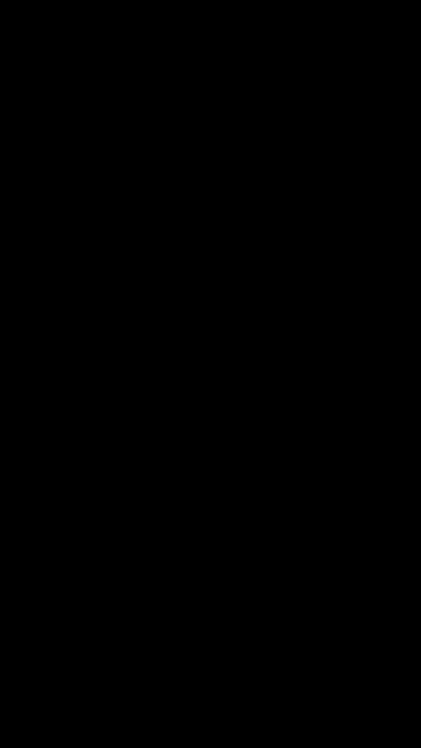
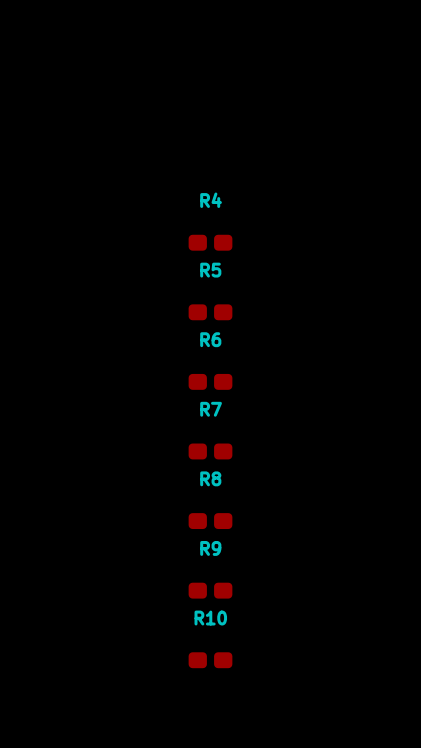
R4: none -> (210, 242)
R5: none -> (210, 312)
R6: none -> (210, 381)
R7: none -> (210, 451)
R8: none -> (210, 521)
R9: none -> (210, 590)
R10: none -> (210, 660)

